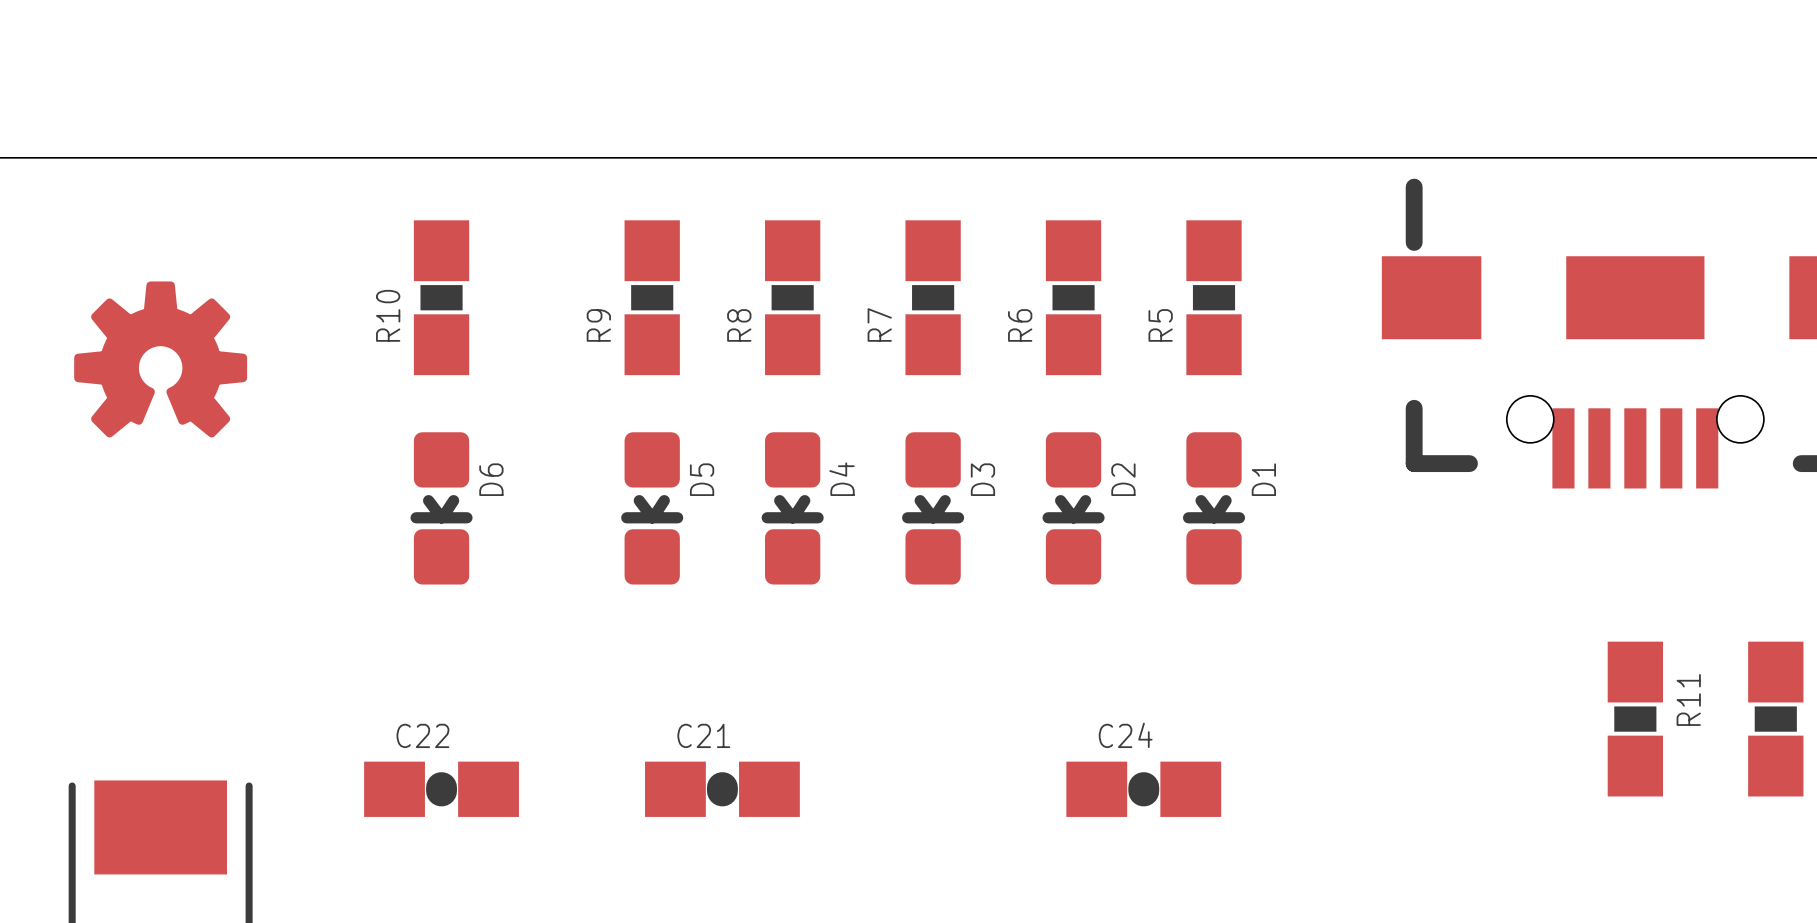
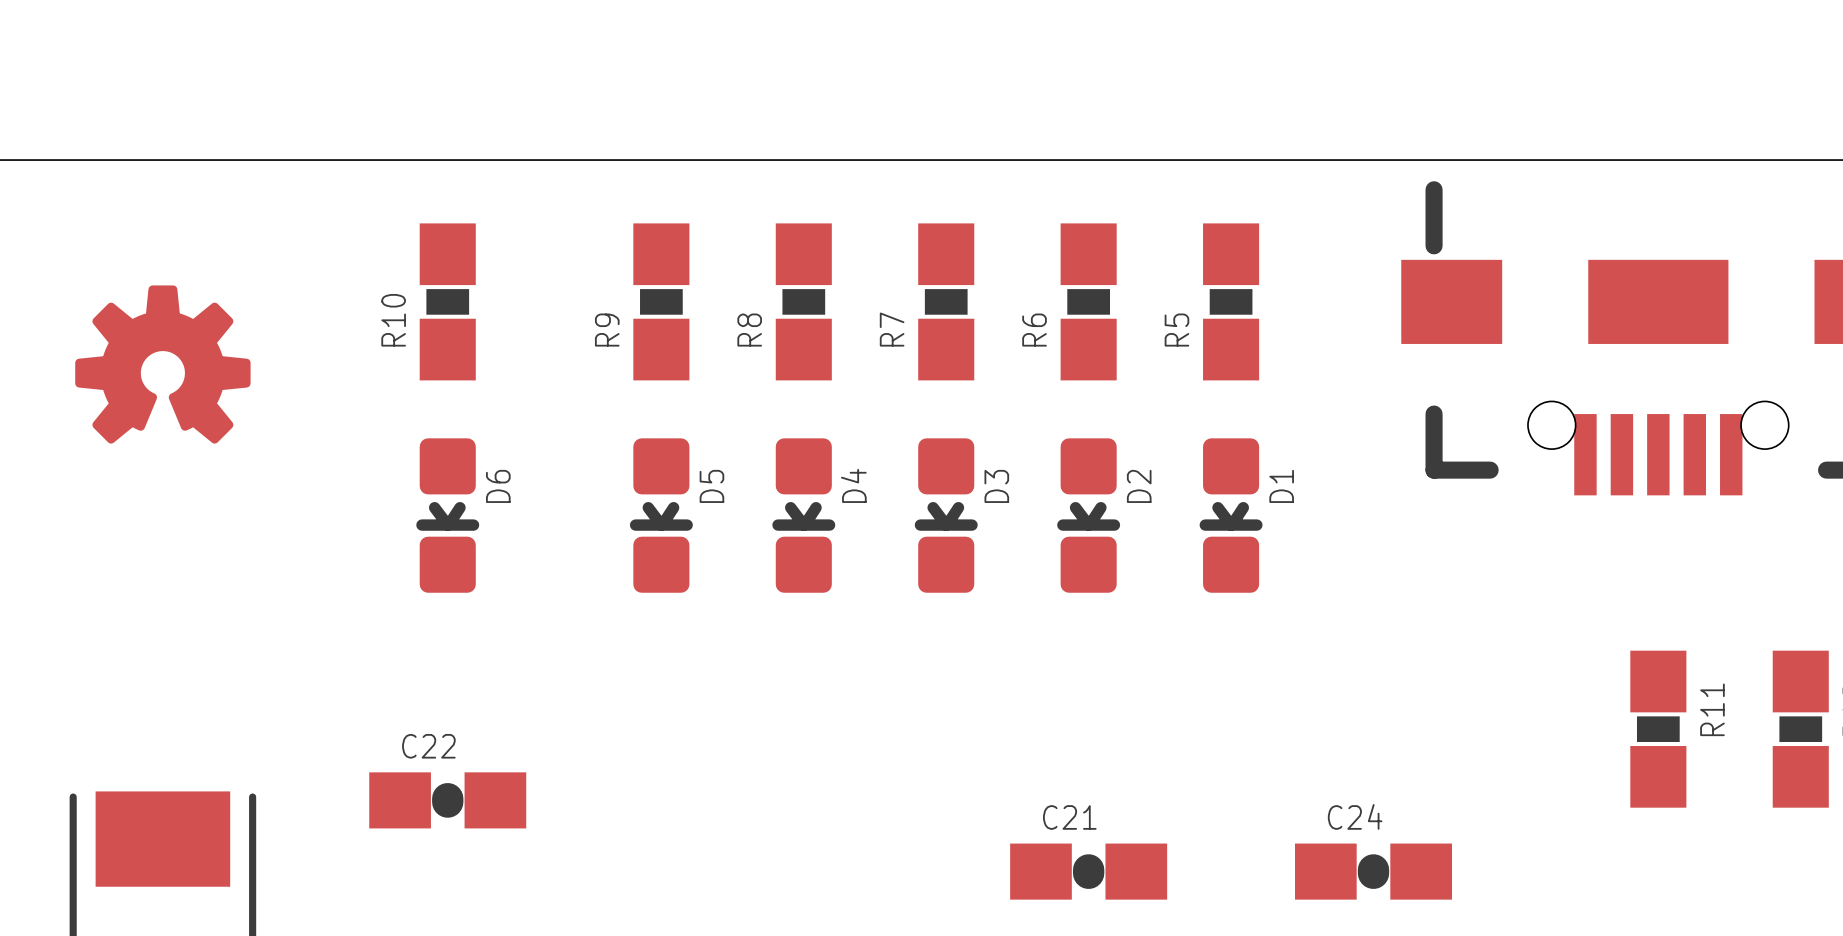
C21 position: (722, 789) -> (1088, 871)
C24 position: (1143, 789) -> (1373, 871)

